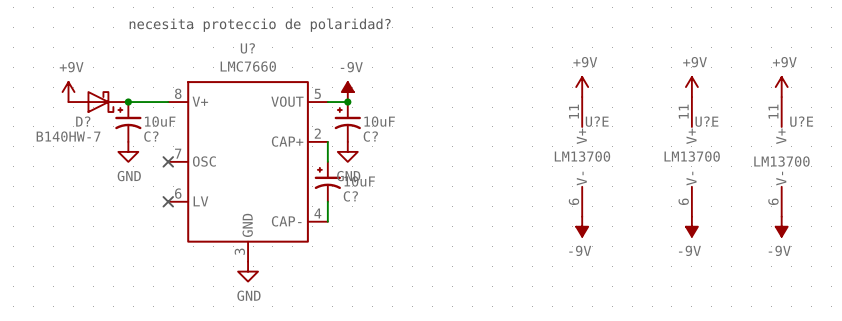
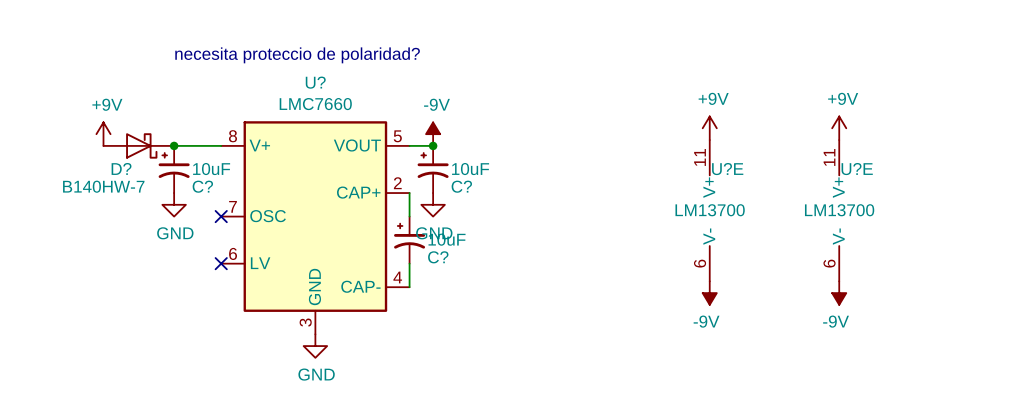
power symbol: +9V (781, 87) -> none
U?E: LM13700 (781, 156) -> none
power symbol: -9V (781, 226) -> none

